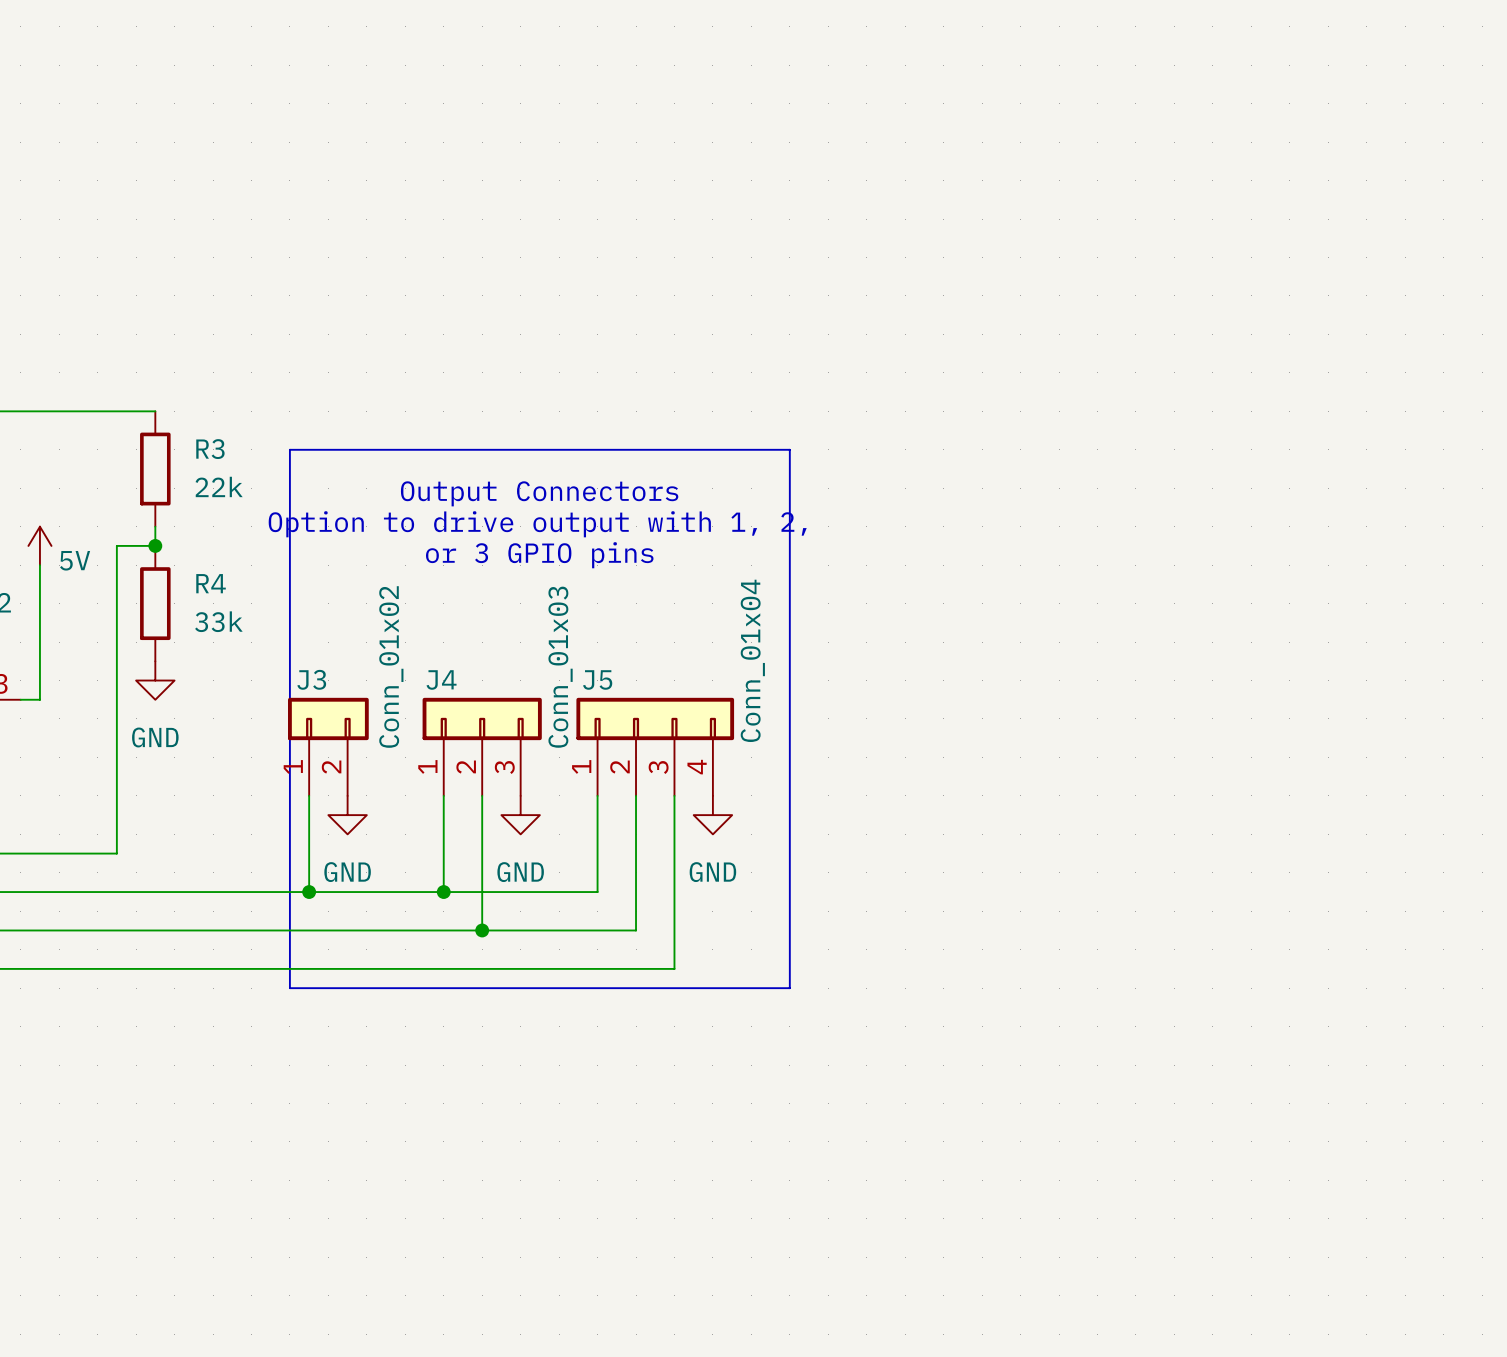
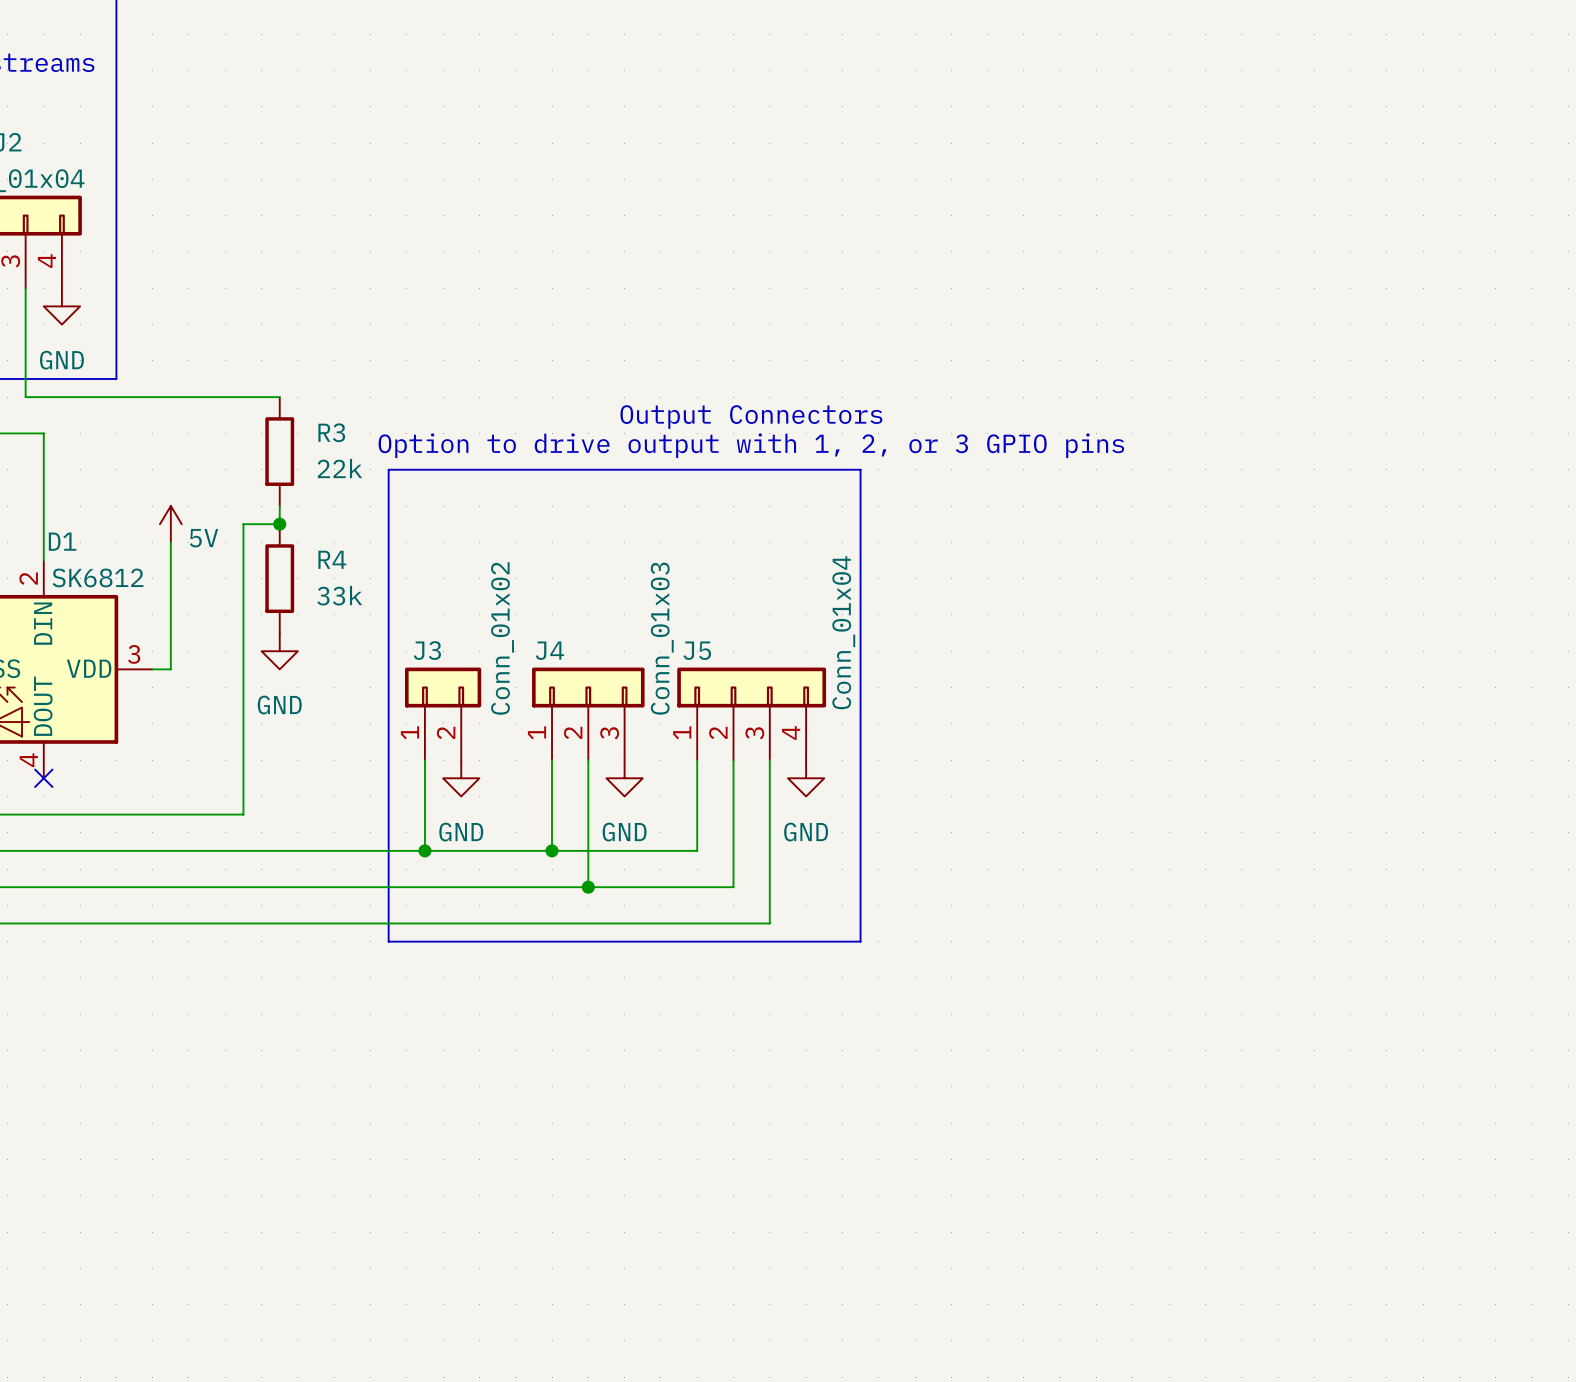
text: none -> Option to drive output with 1, 2, or 3 GPIO pins (751, 445)
text position: Output Connectors (539, 493) -> Output Connectors (751, 417)
text: Option to drive output with 1, 2, (537, 524) -> none
text: or 3 GPIO pins (539, 555) -> none
line: (289, 988) (289, 449) (789, 449) (789, 988) (770, 988) -> (406, 941) (388, 941) (388, 469) (860, 469) (860, 941)

